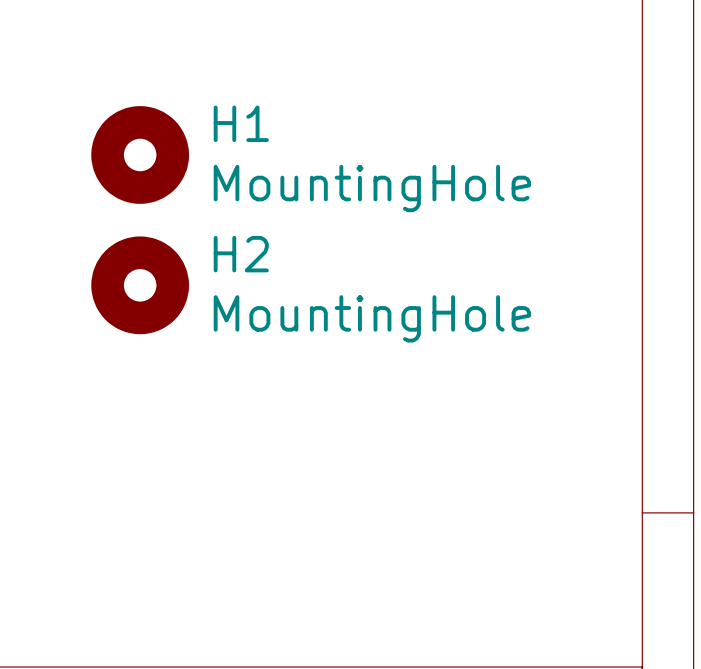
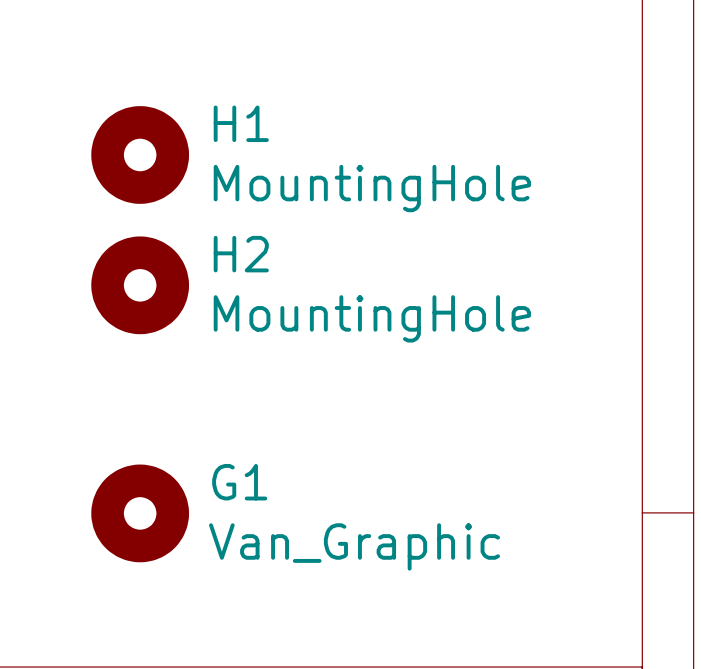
G1: none -> Van_Graphic (140, 513)

